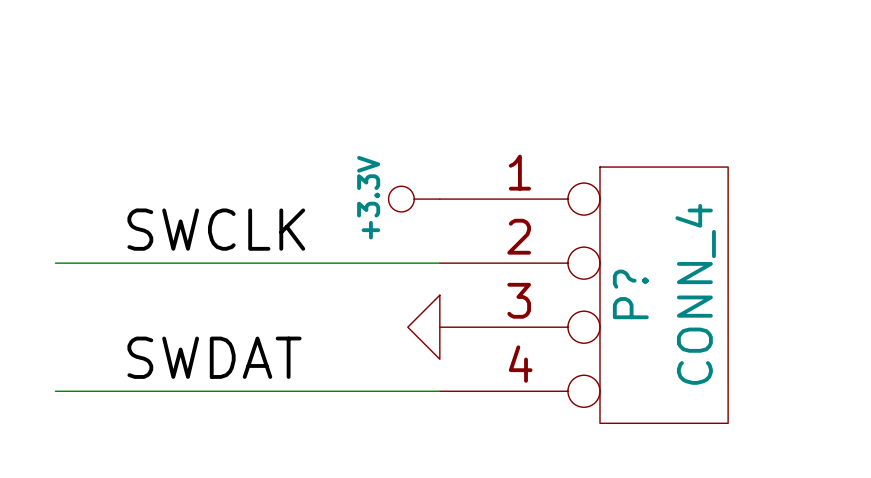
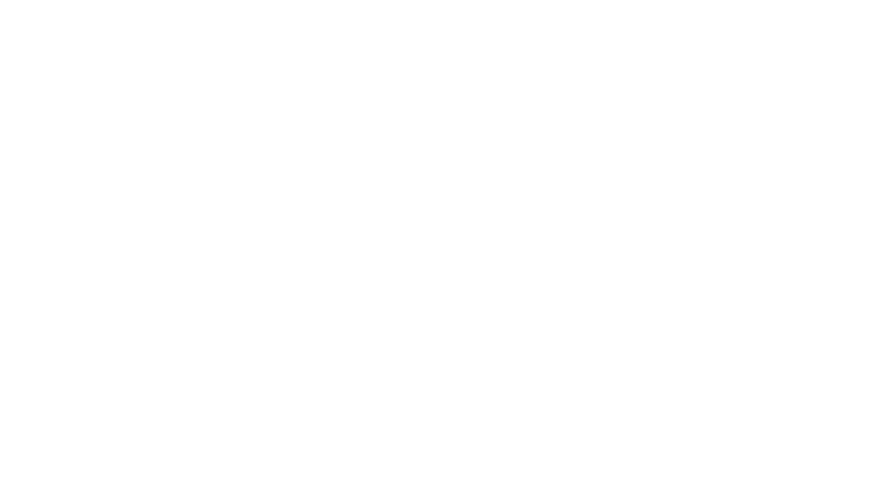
power symbol: +3.3V (414, 199) -> none
label: SWCLK (216, 229) -> none
wire: (55, 263) (439, 263) -> none
P?: CONN_4 (583, 295) -> none
power symbol: (423, 327) -> none
label: SWDAT (214, 357) -> none
wire: (55, 391) (439, 391) -> none

